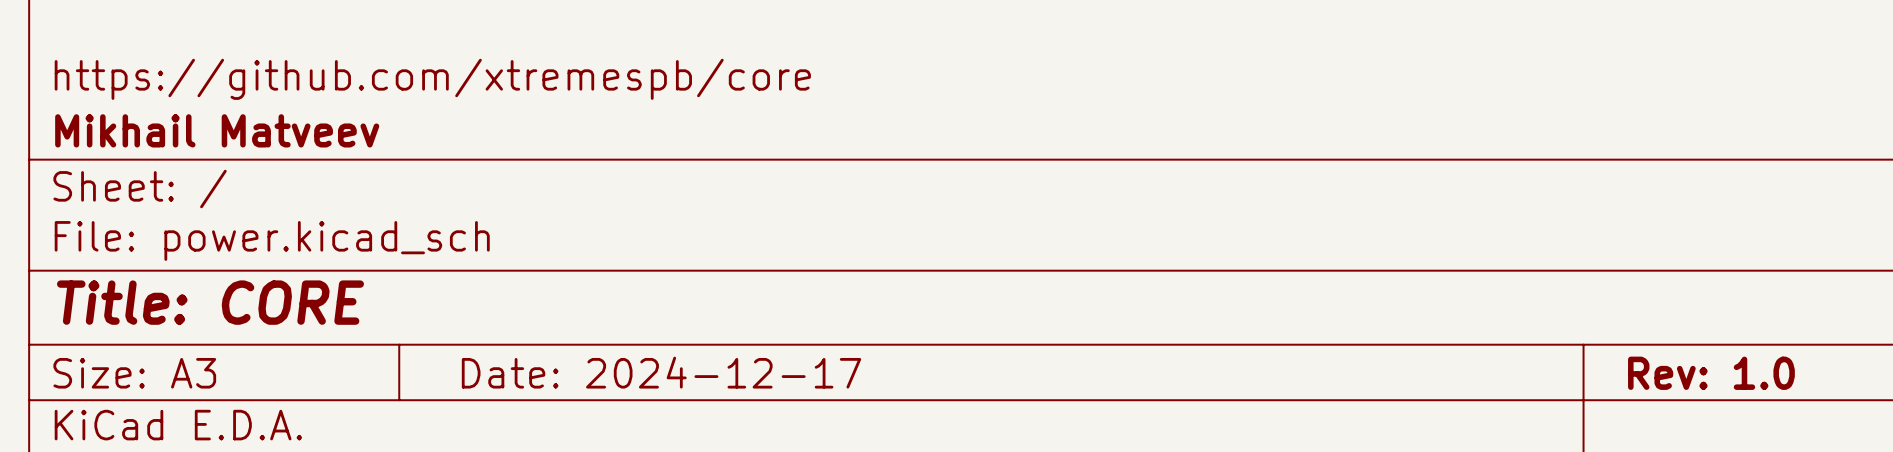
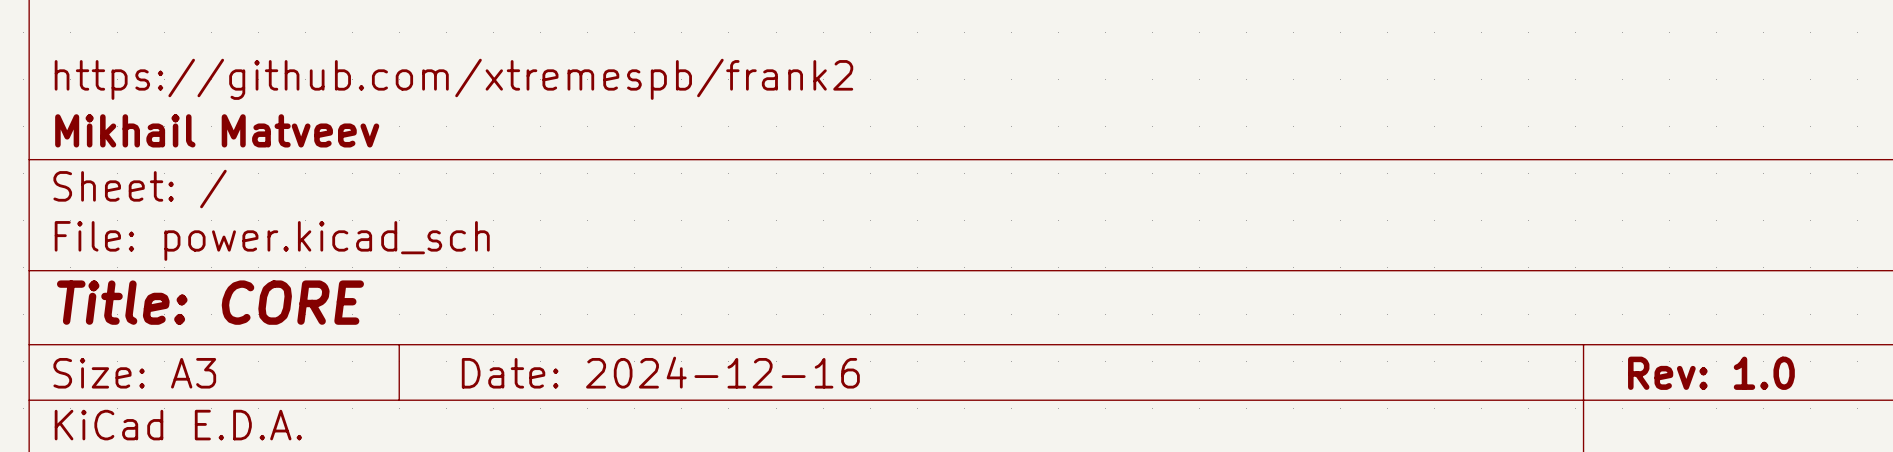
title block: https://github.com/xtremespb/core (432, 79) -> https://github.com/xtremespb/frank2 (453, 79)
title block: Date: 2024-12-17 (661, 372) -> Date: 2024-12-16 (660, 372)

